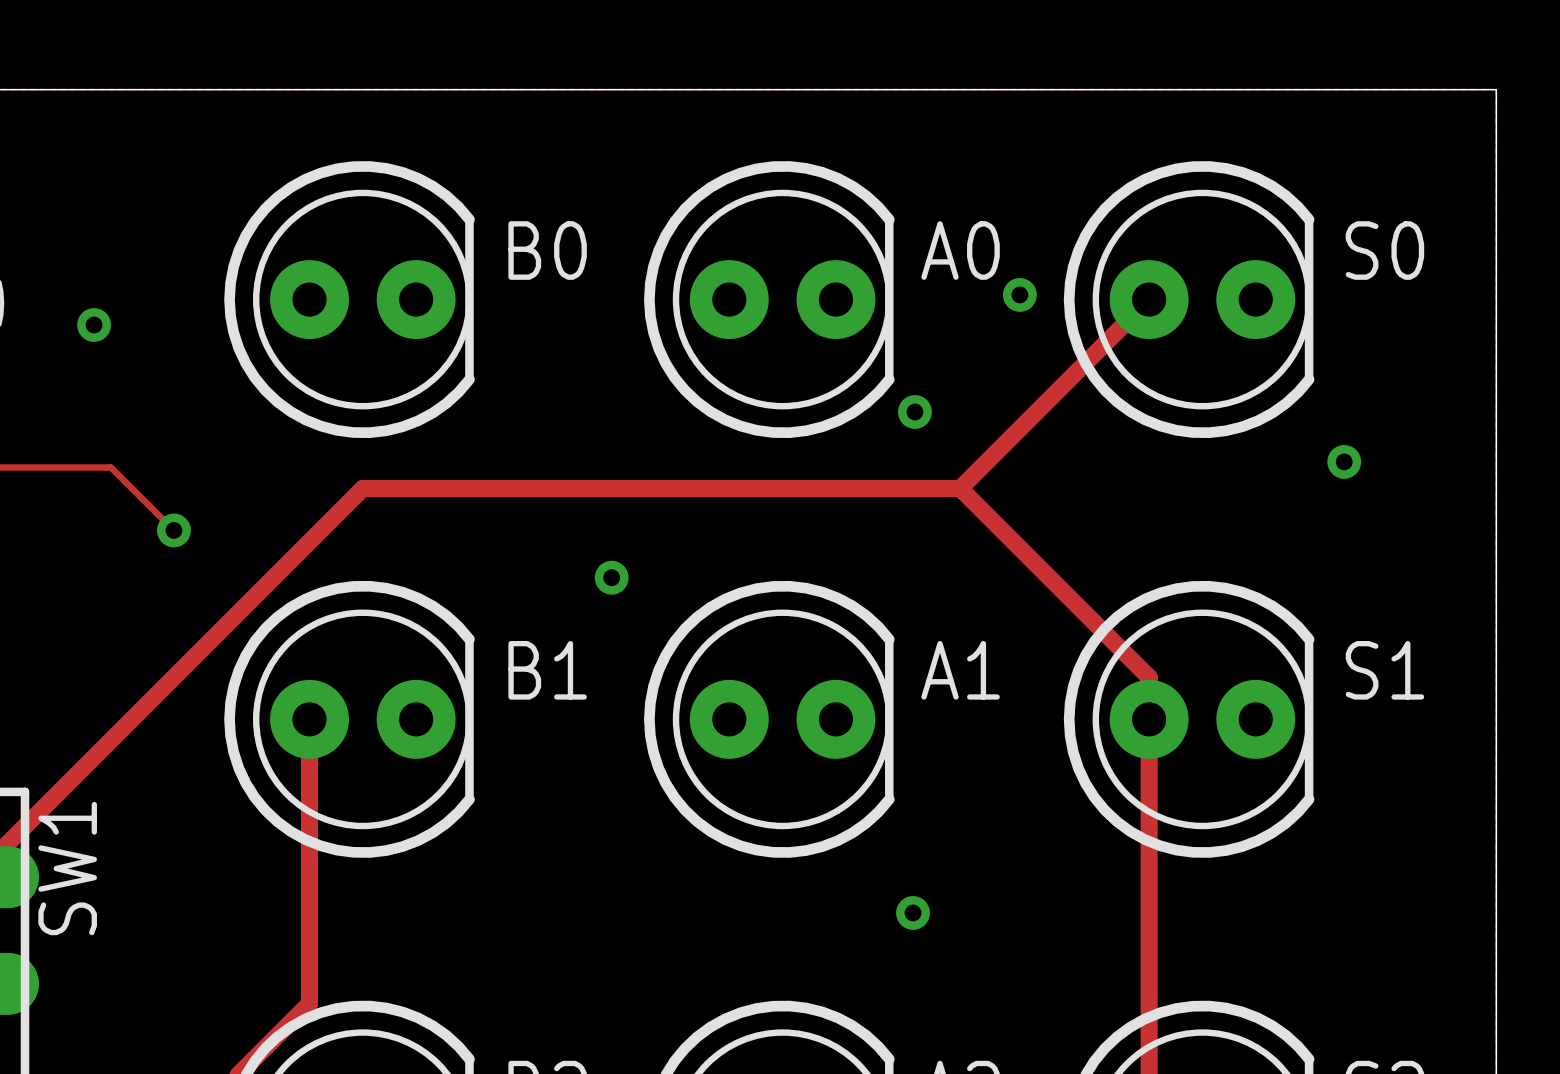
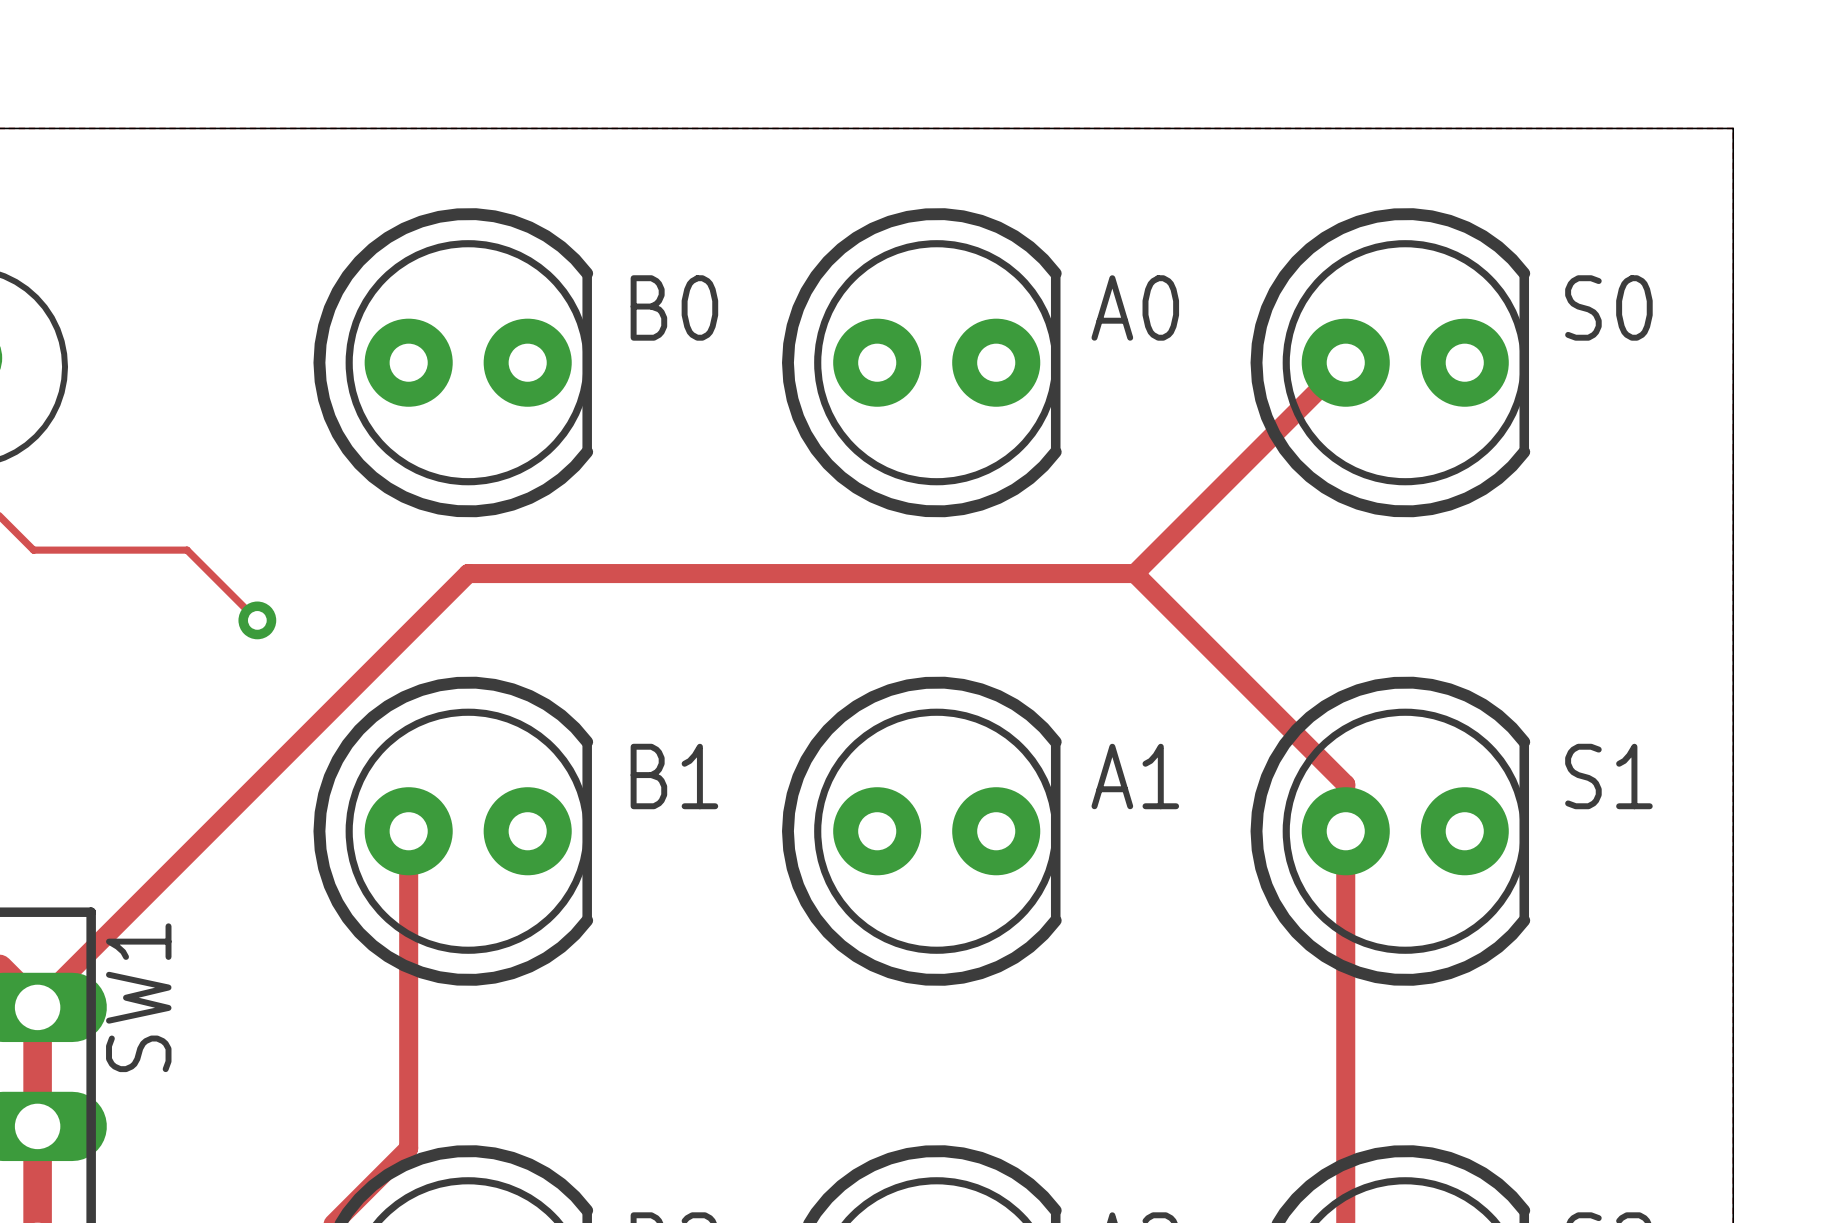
via: (1019, 294) -> none
via: (94, 325) -> none
via: (914, 412) -> none
via: (1344, 461) -> none
via: (611, 577) -> none
via: (913, 912) -> none

